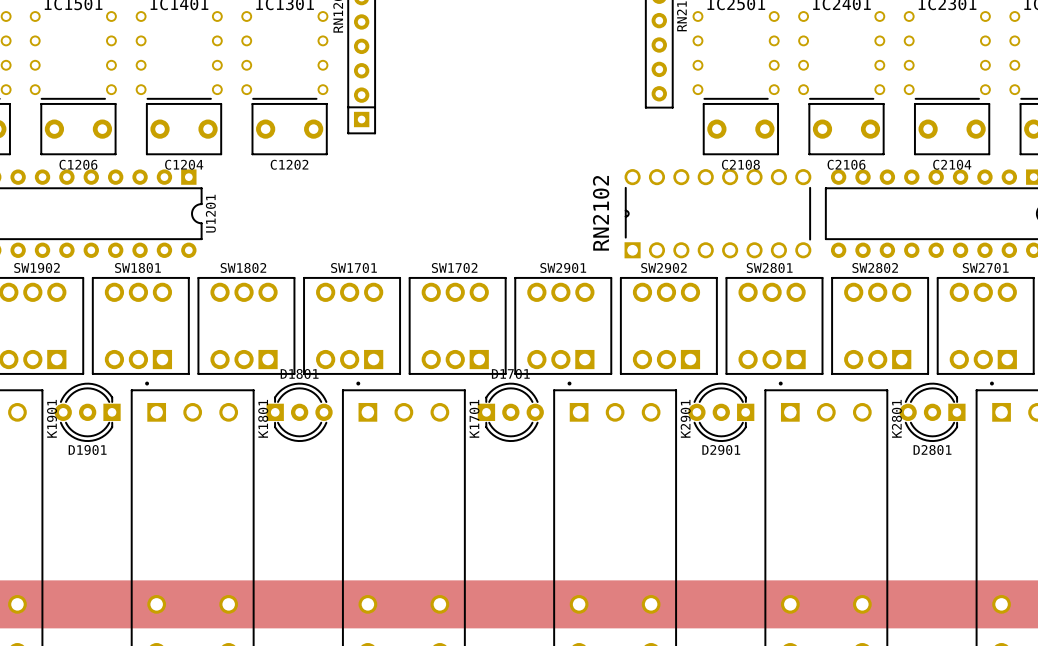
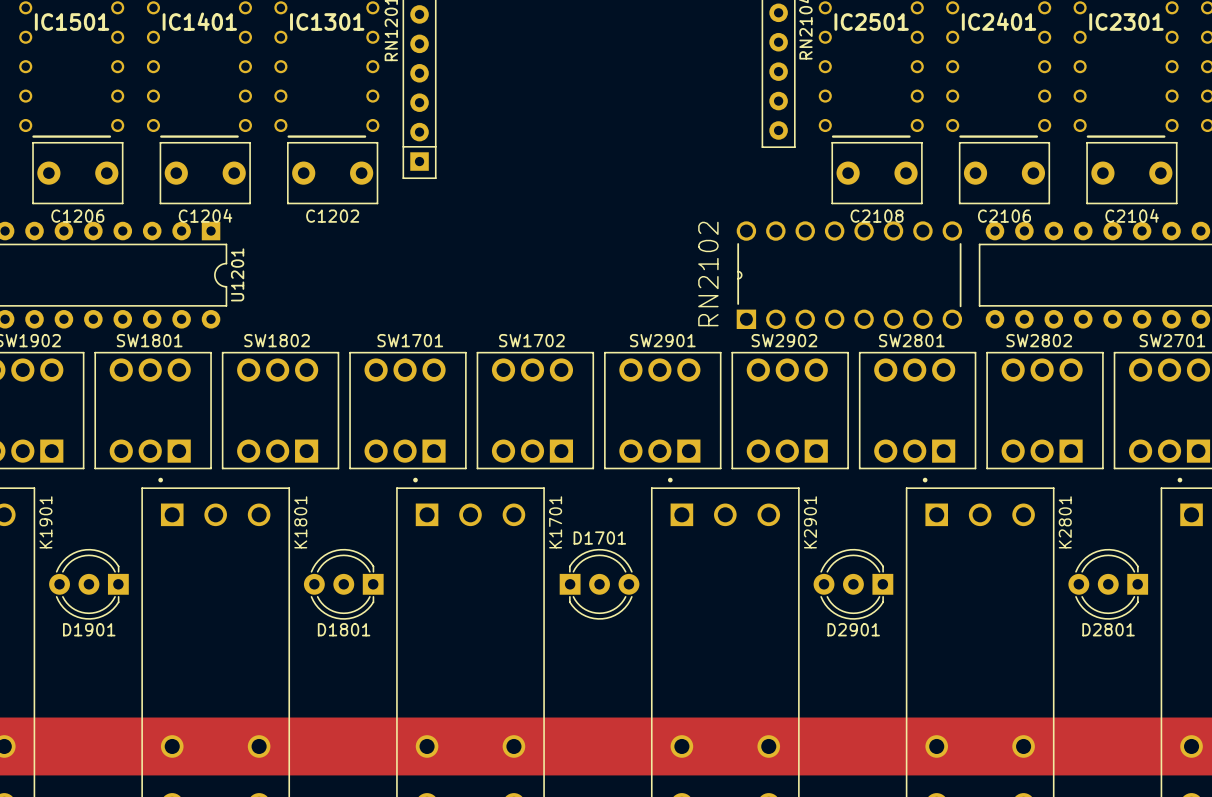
D1901 position: (87, 412) -> (88, 584)
D1801 rotation: 0° (299, 412) -> 180° (343, 584)
D1801 position: (299, 412) -> (343, 584)
D1701 position: (510, 412) -> (599, 584)
D2901 position: (721, 412) -> (853, 584)
D2801 position: (932, 412) -> (1108, 584)

